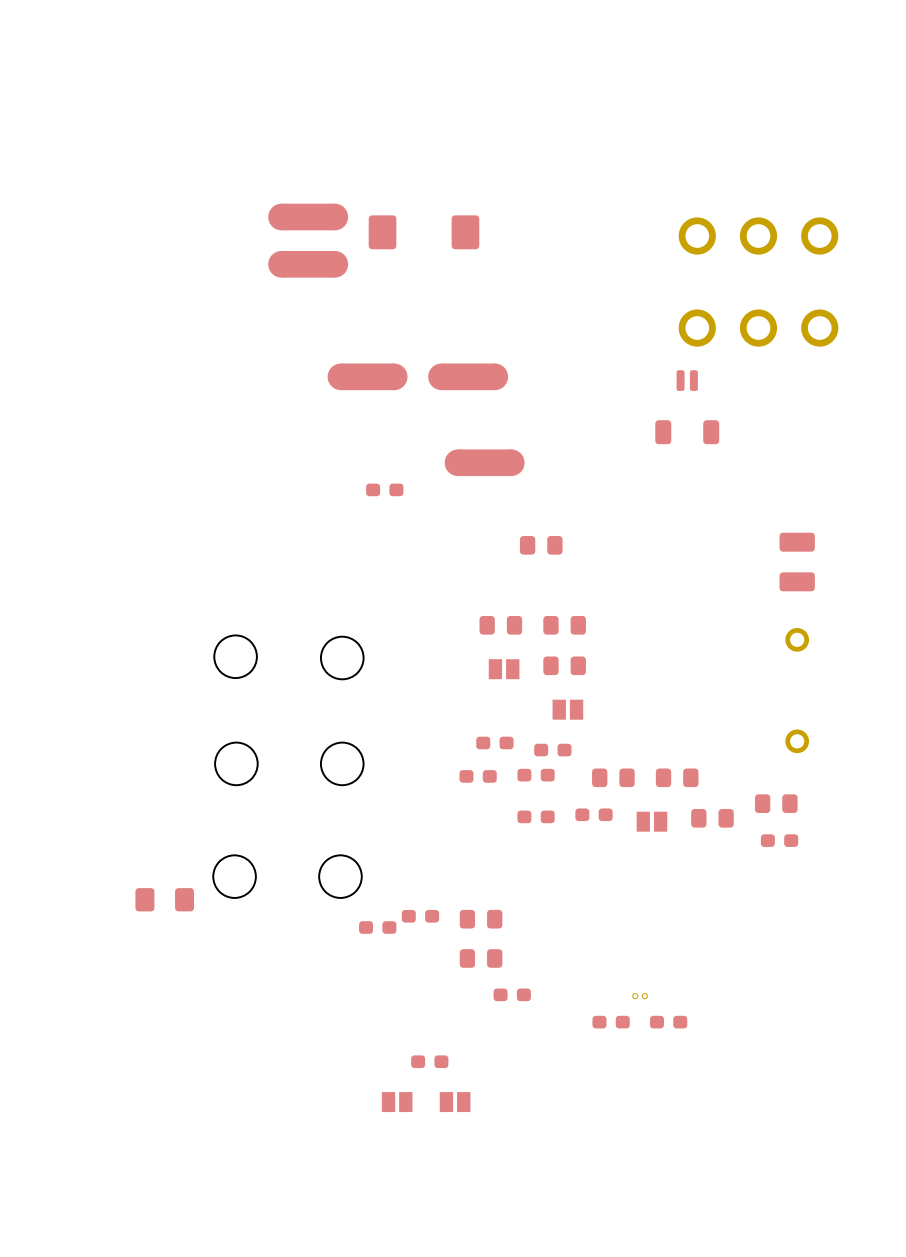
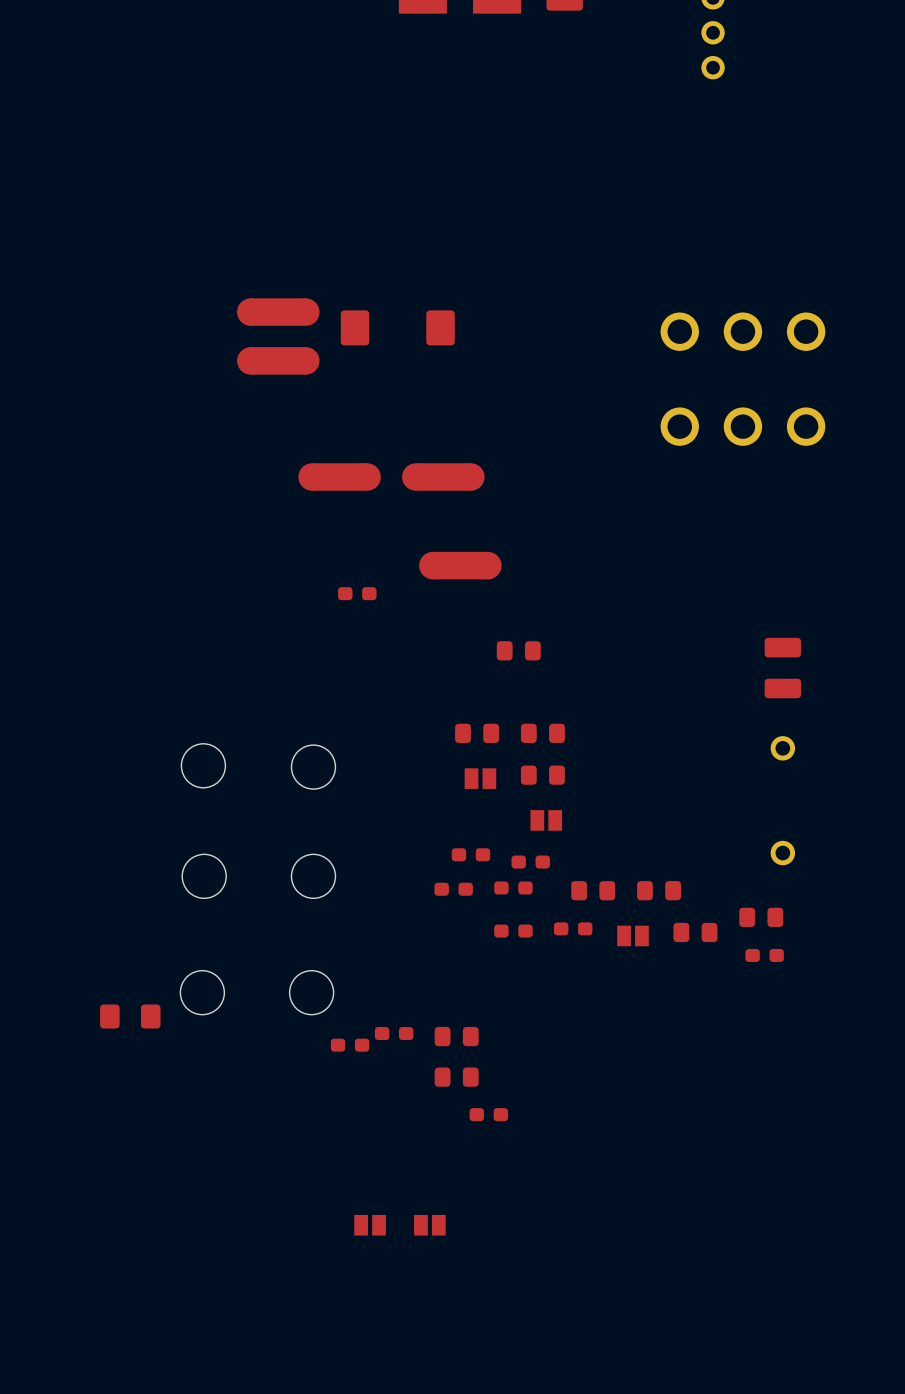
part: (687, 407) -> none
part: (640, 996) -> none
part: (611, 1022) -> none
part: (668, 1022) -> none
part: (429, 1061) -> none

